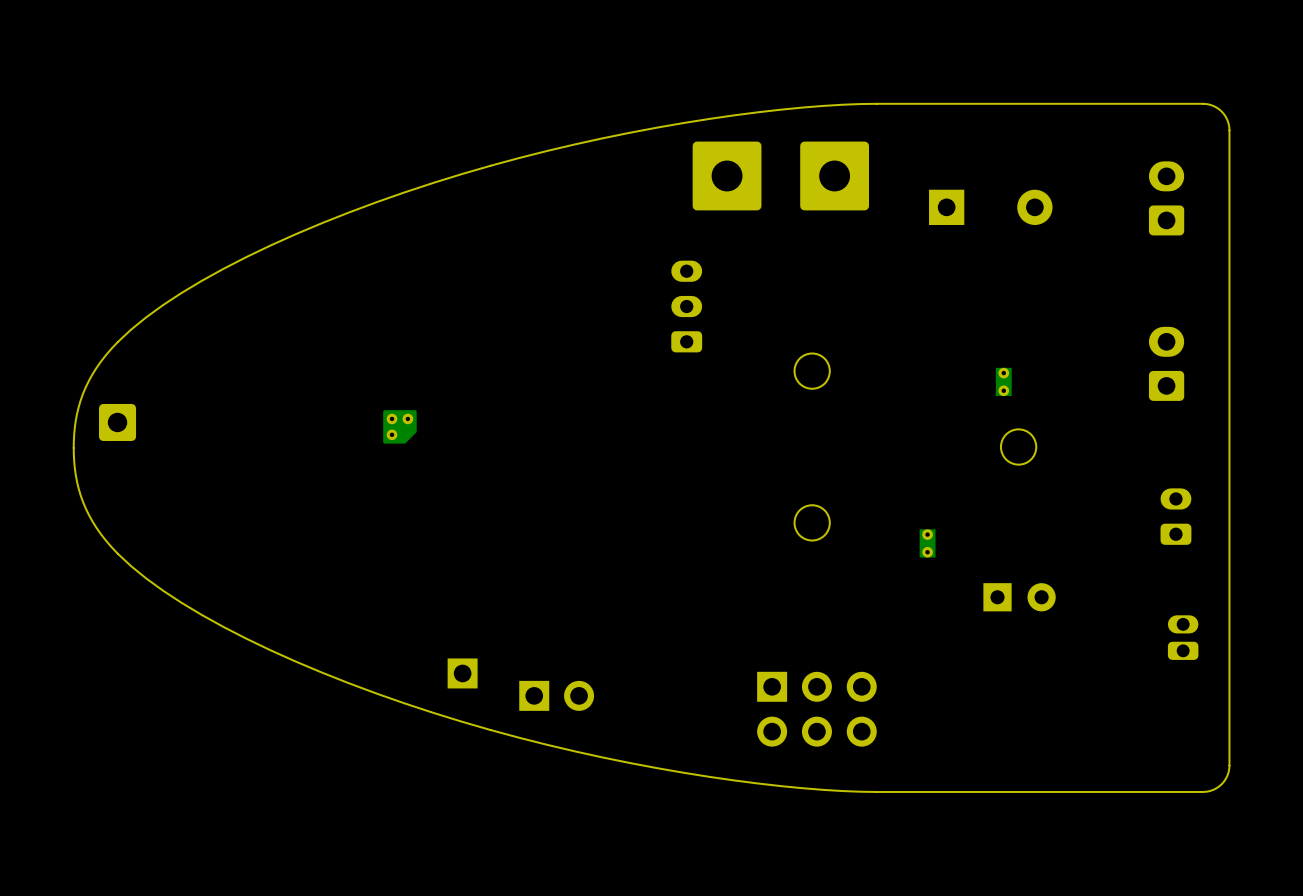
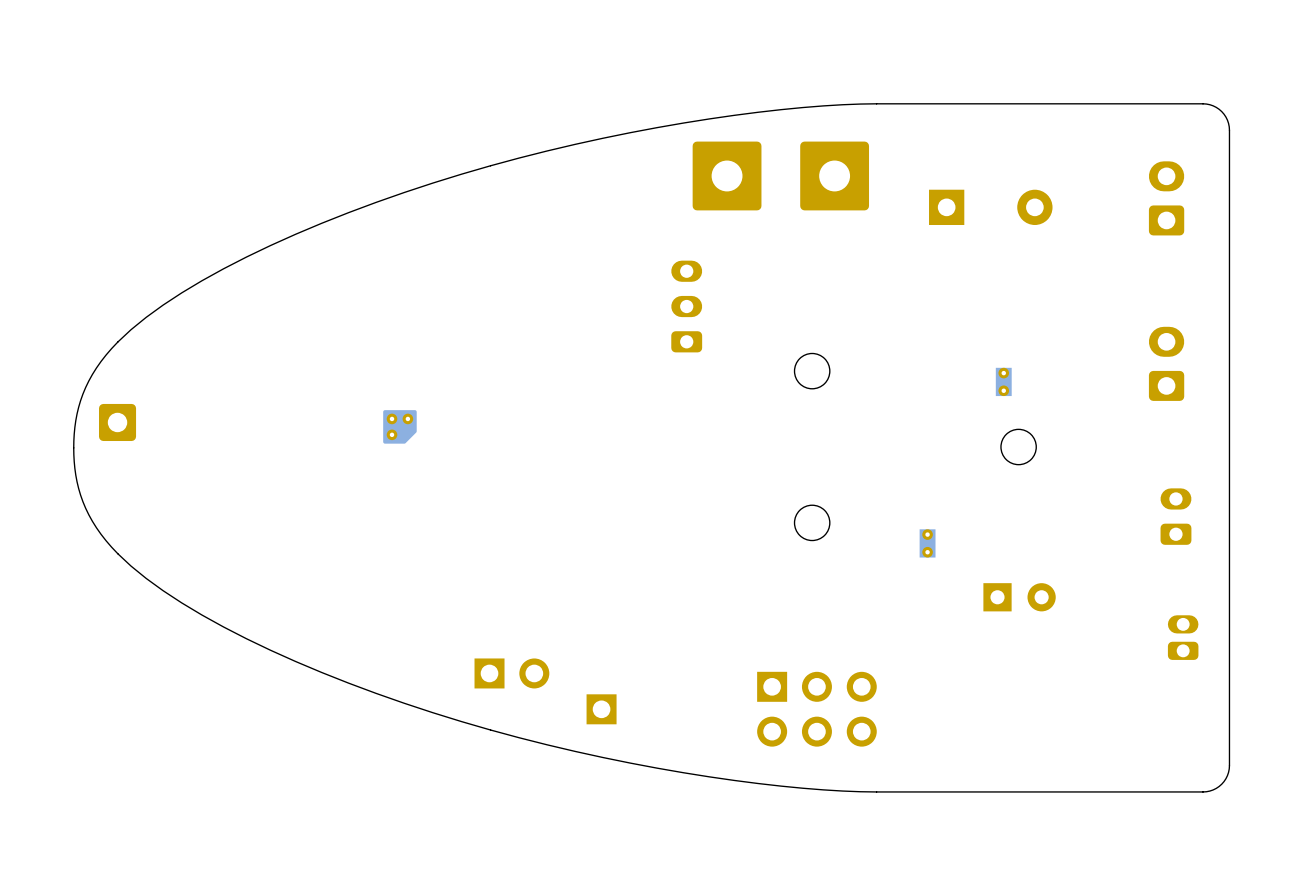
part position: (462, 673) -> (601, 709)
part position: (556, 695) -> (511, 673)

